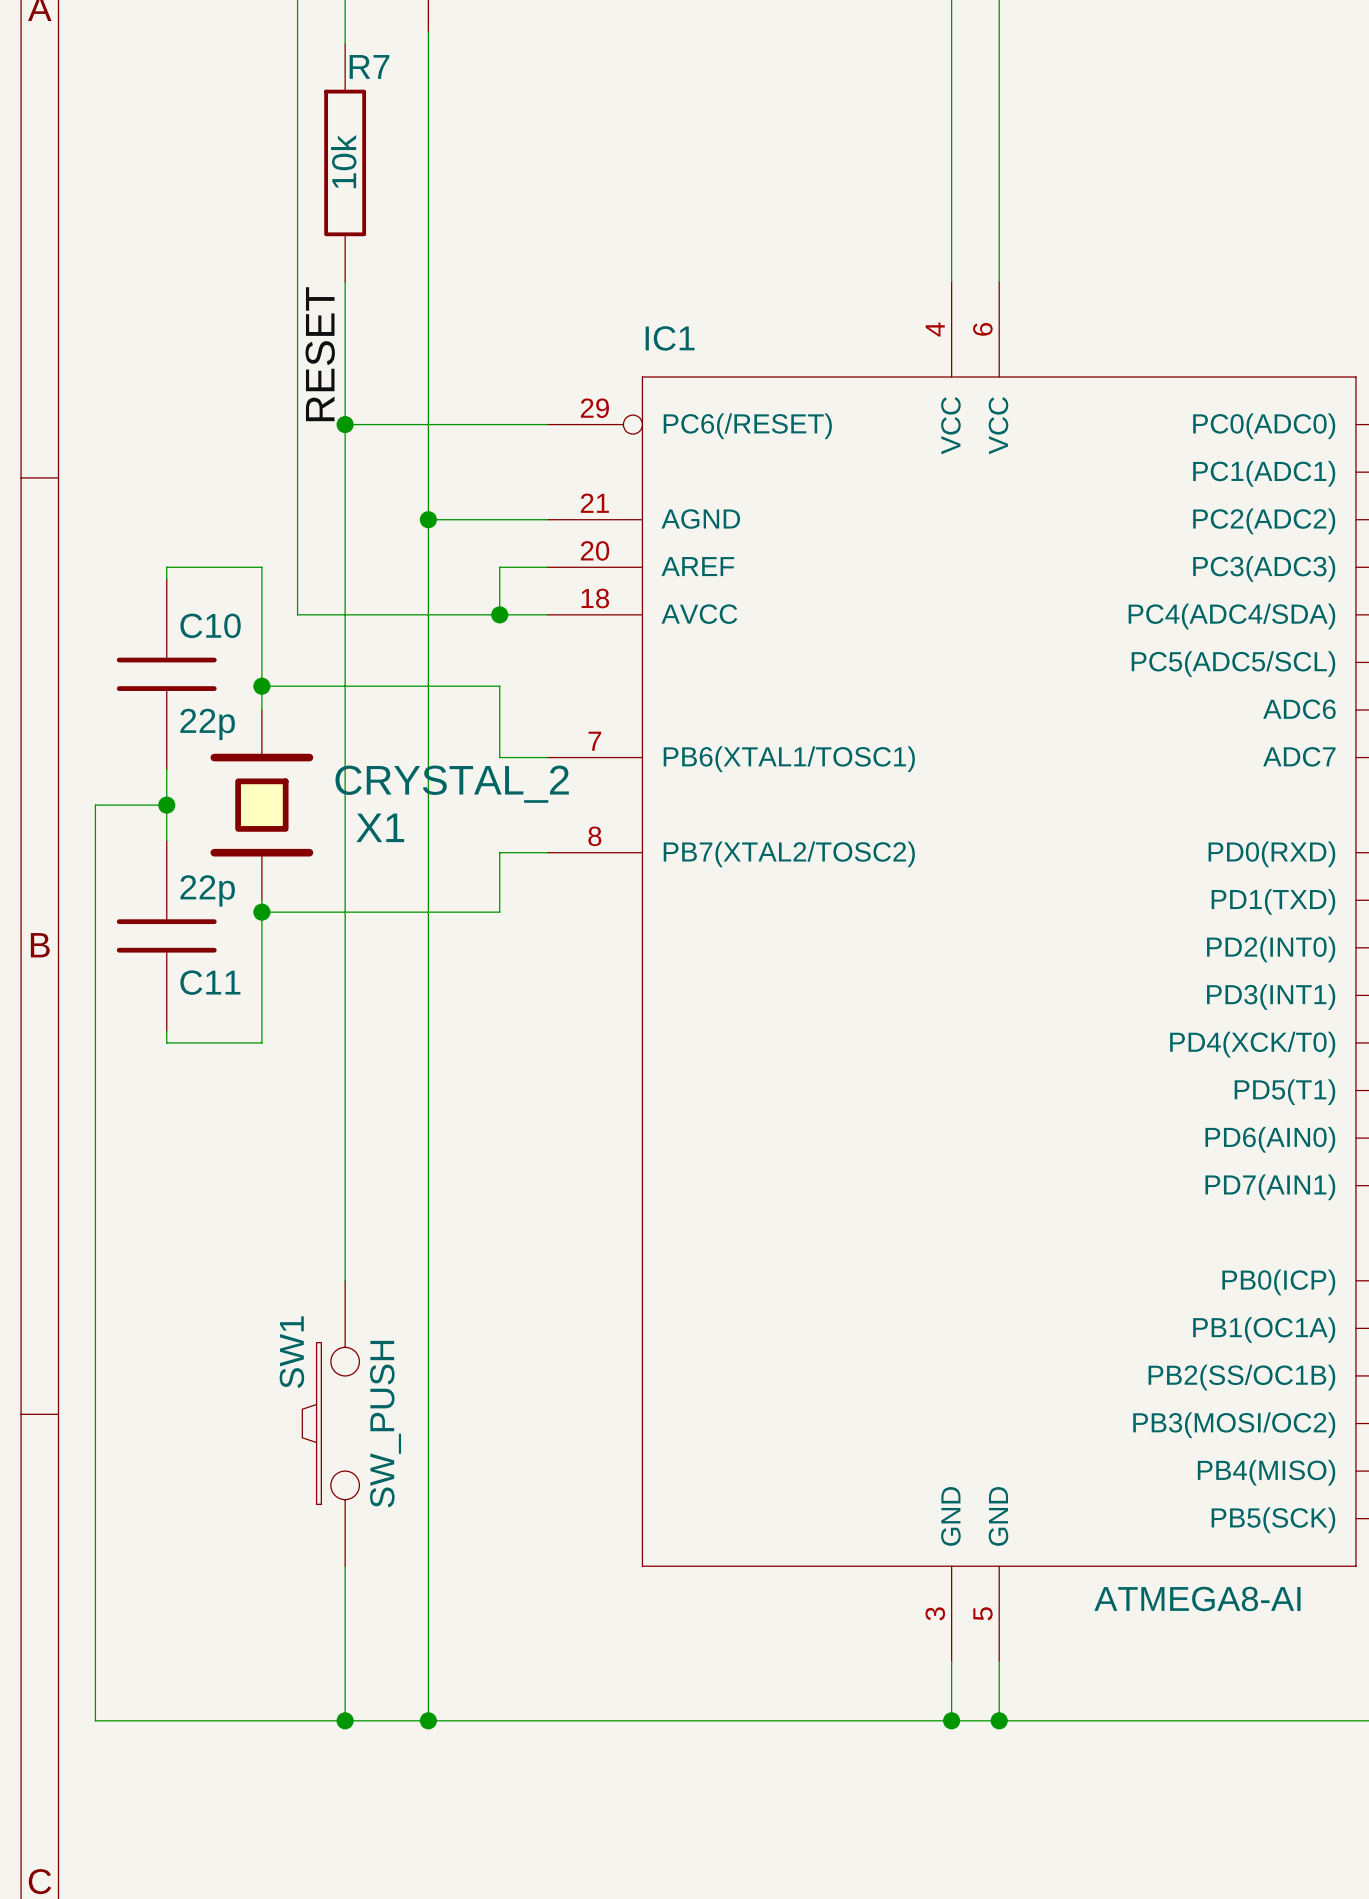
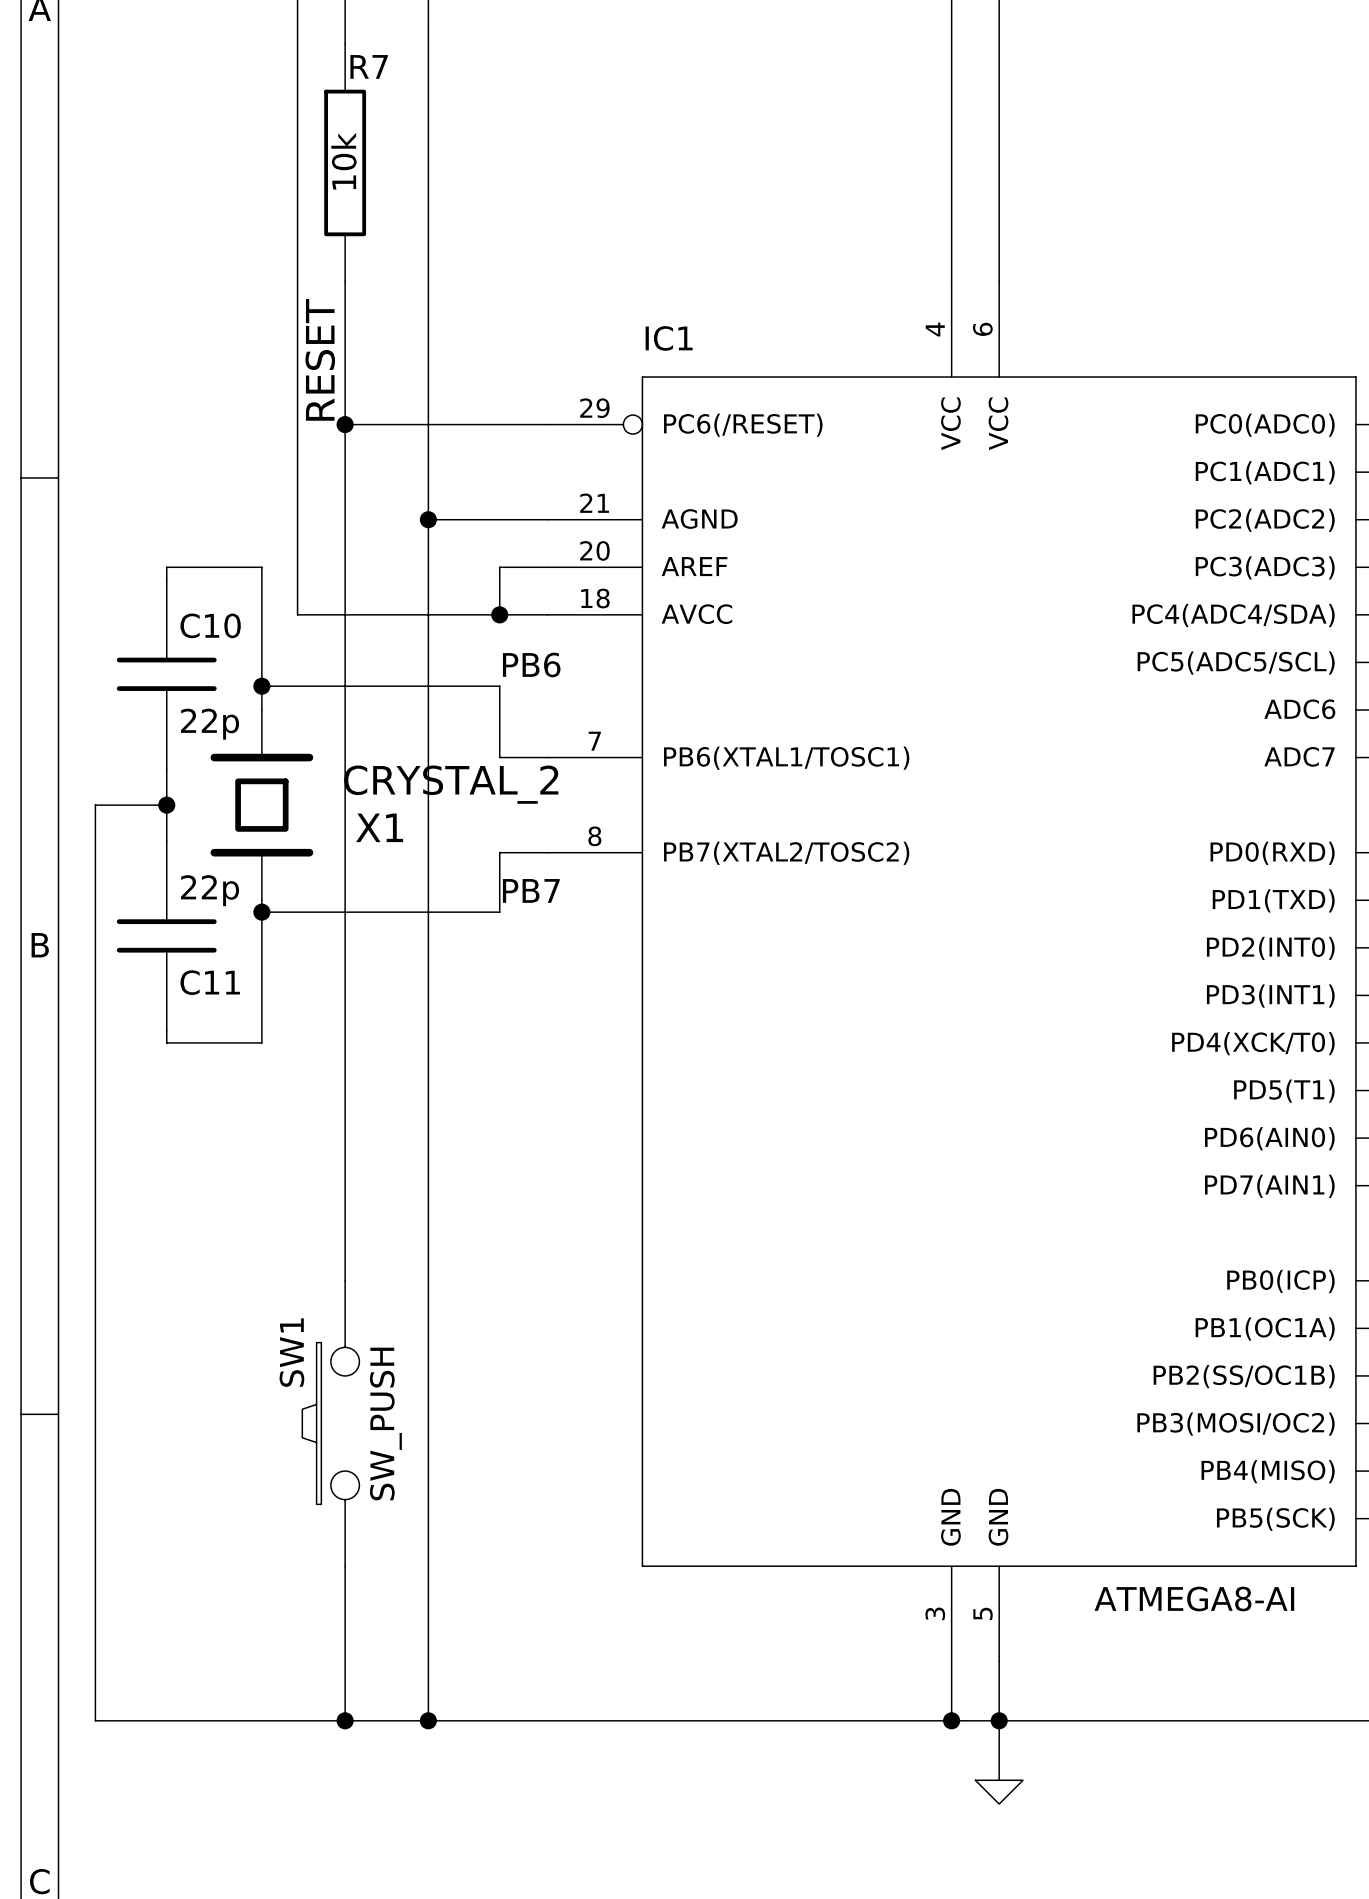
label: none -> PB6 (531, 665)
label: none -> PB7 (531, 890)
wire: none -> (999, 1720) (999, 1780)
power symbol: none -> (999, 1792)

